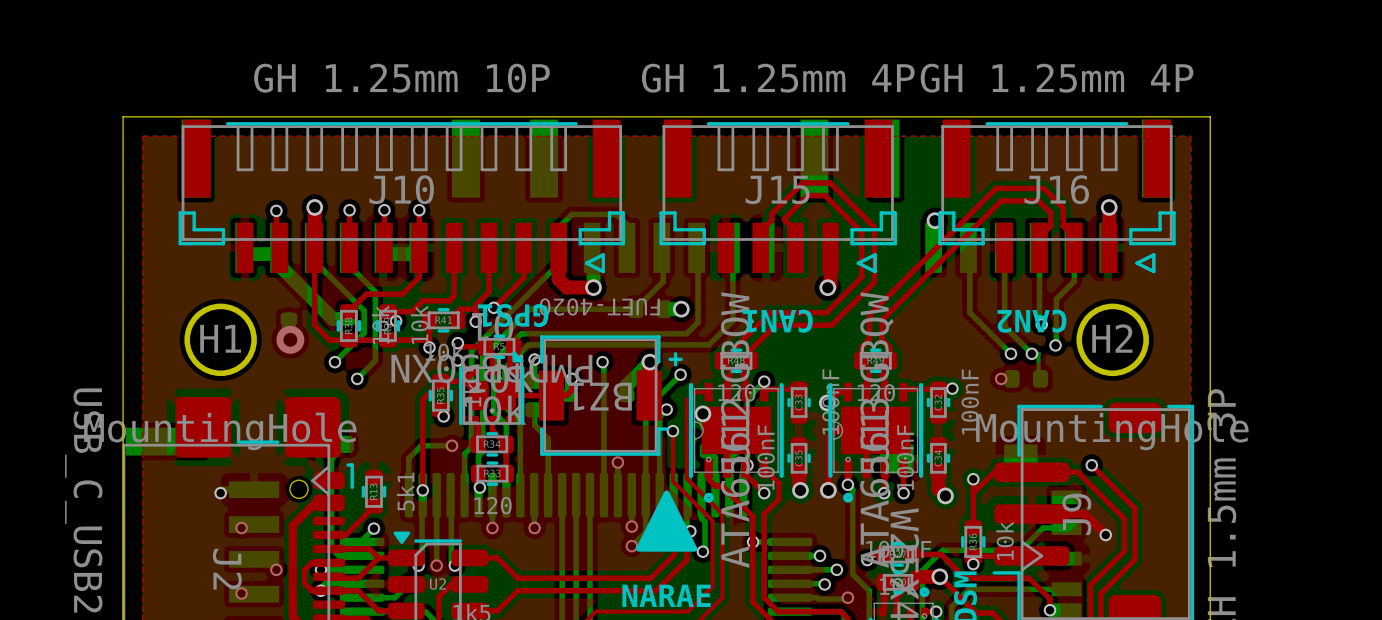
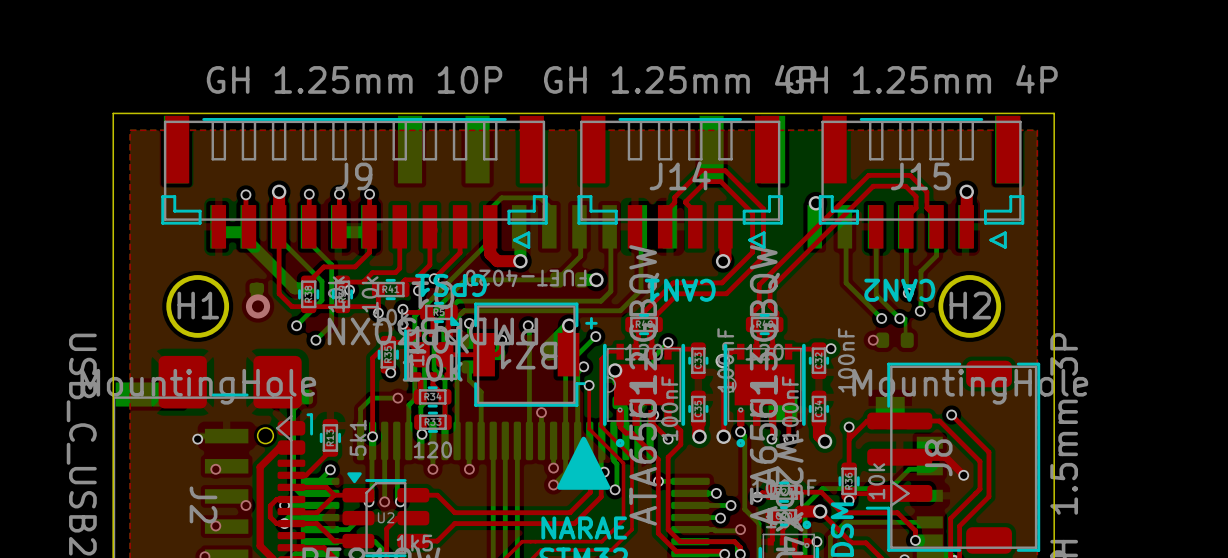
J10 name: J10 (401, 189) -> J9 (353, 176)
J15 name: J15 (777, 189) -> J14 (680, 175)
J16 name: J16 (1056, 189) -> J15 (920, 176)
J9 name: J9 (1076, 514) -> J8 (938, 457)

